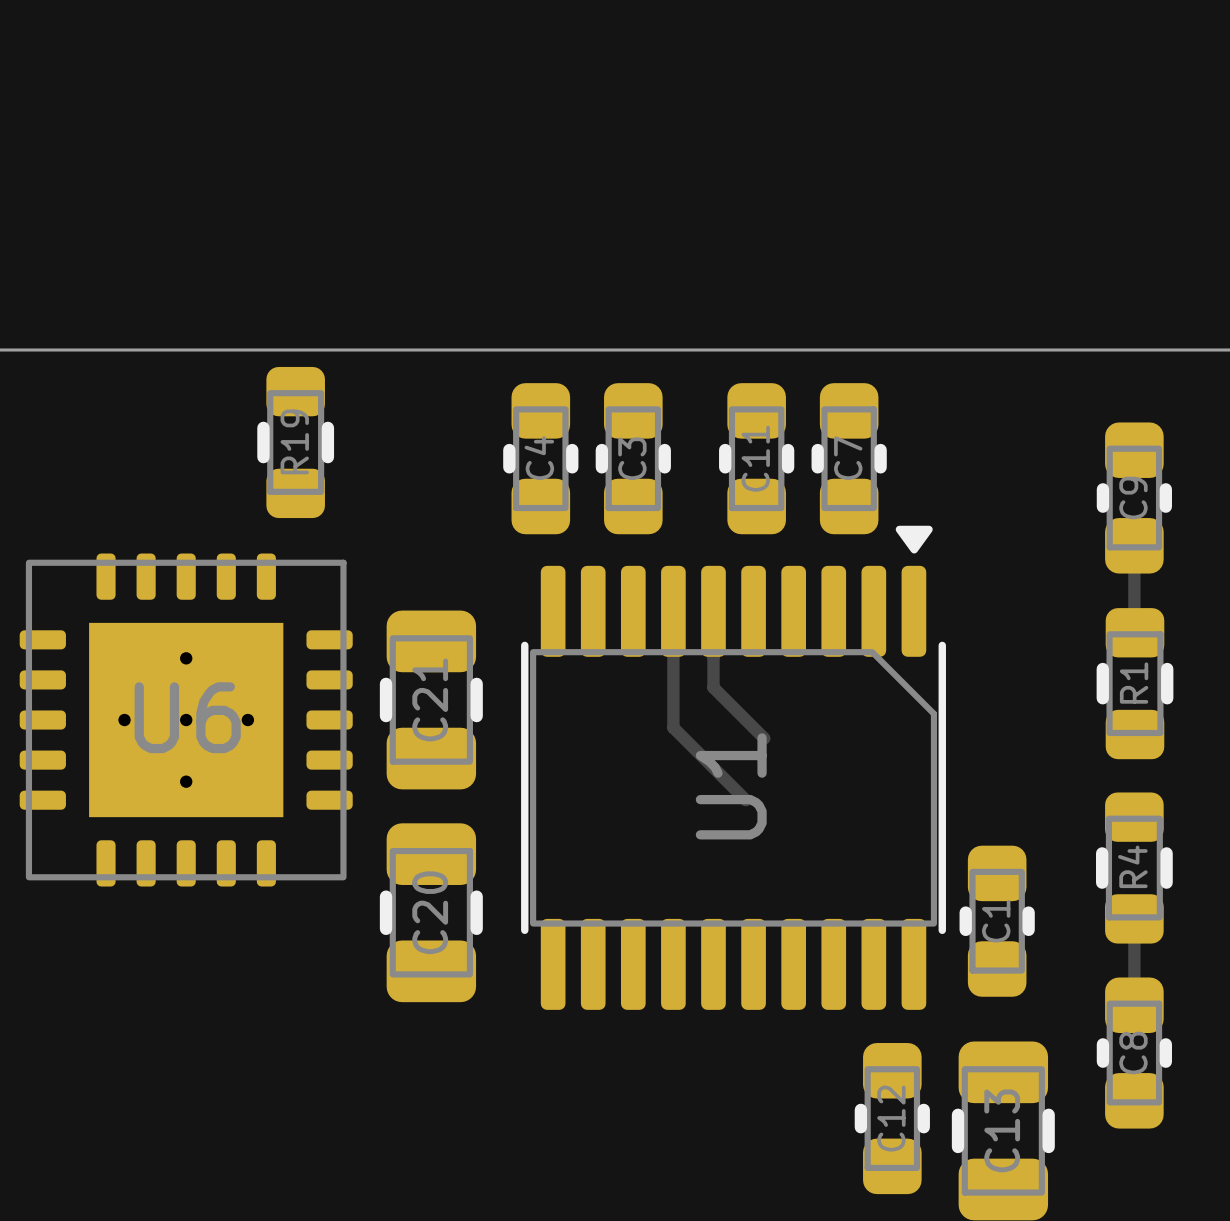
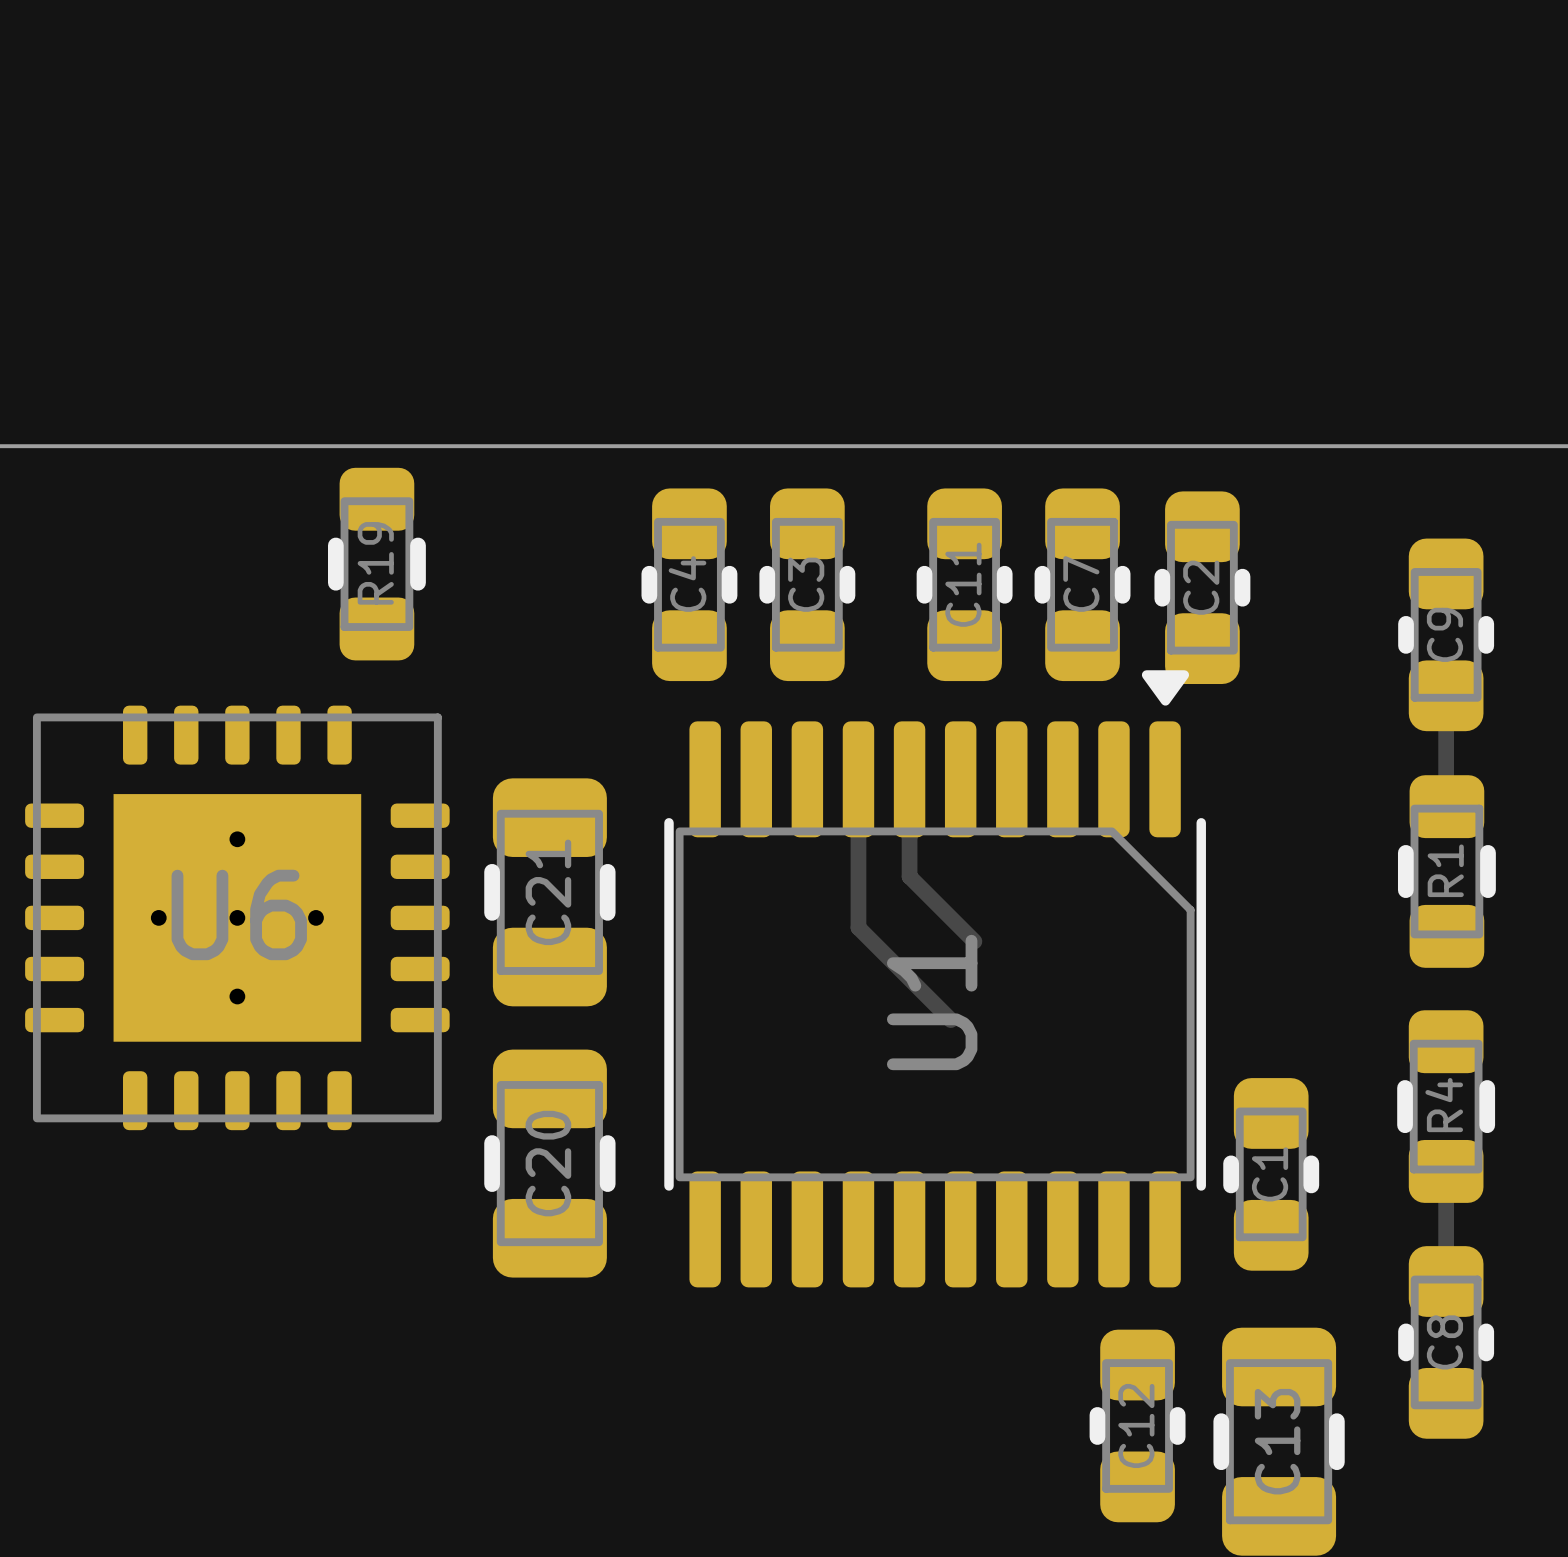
C2: none -> (1202, 587)

